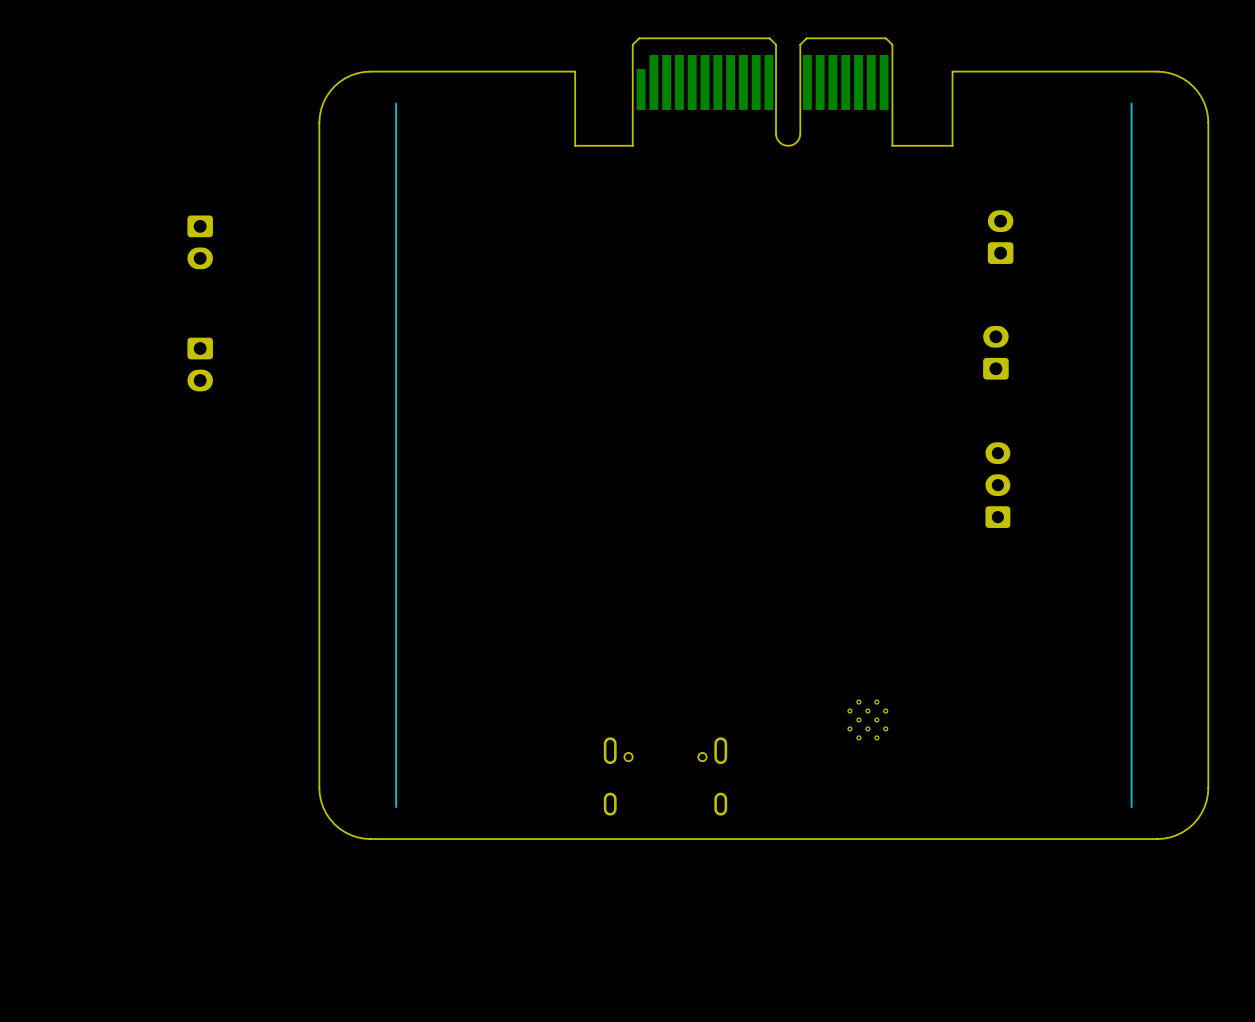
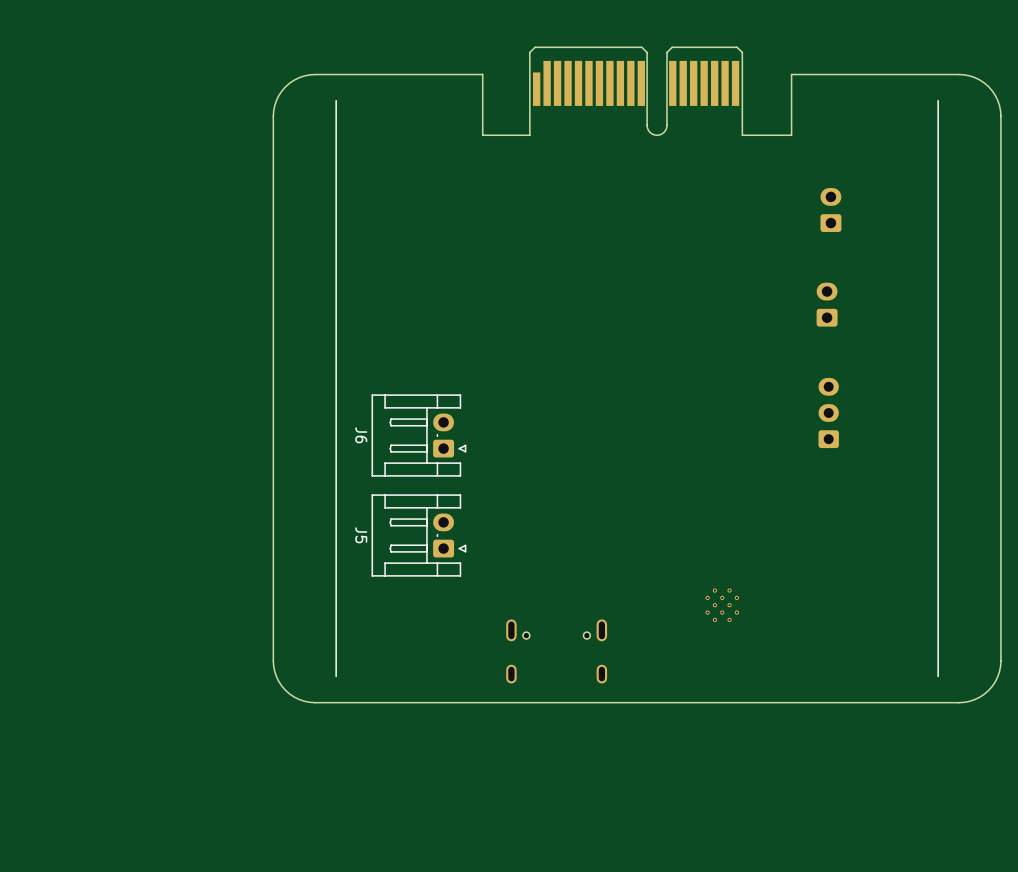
part: (200, 242) -> none
part: (200, 364) -> none
J6: none -> (418, 435)
J5: none -> (418, 535)

